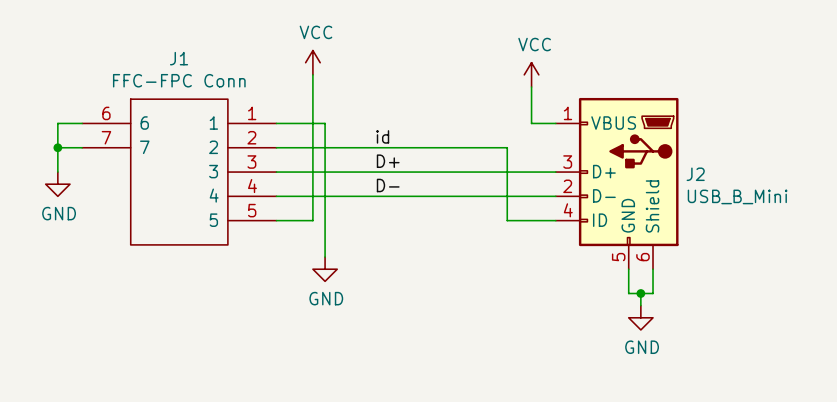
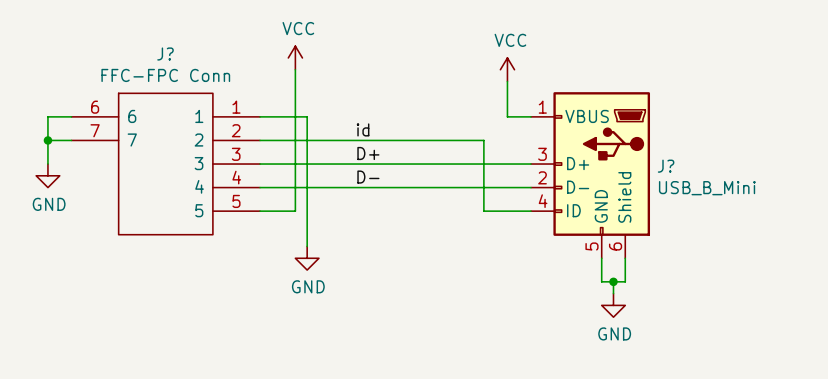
J1 name: J1 (179, 58) -> J? (165, 54)
J2 name: J2 (695, 174) -> J? (666, 166)

